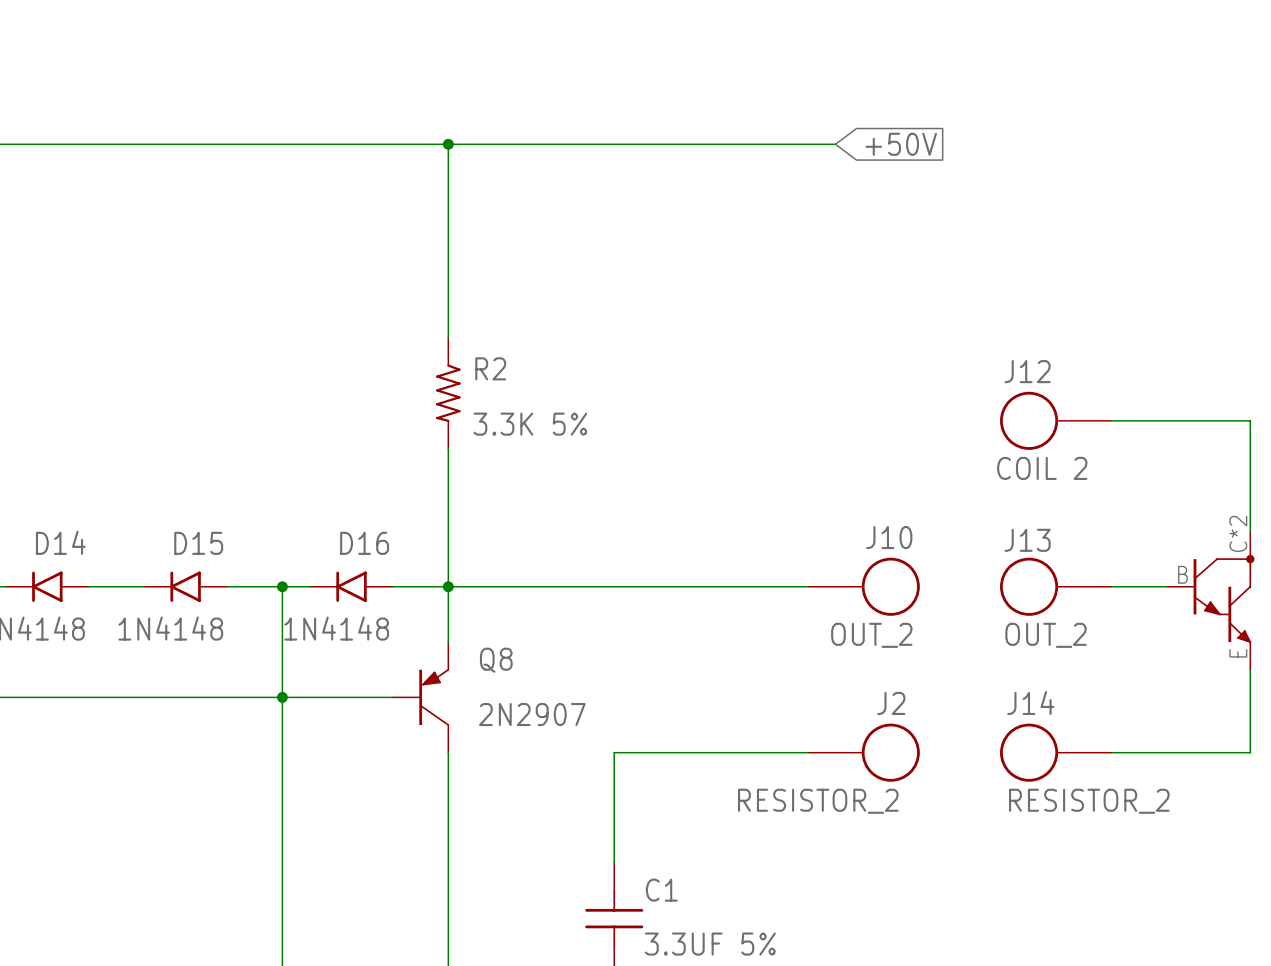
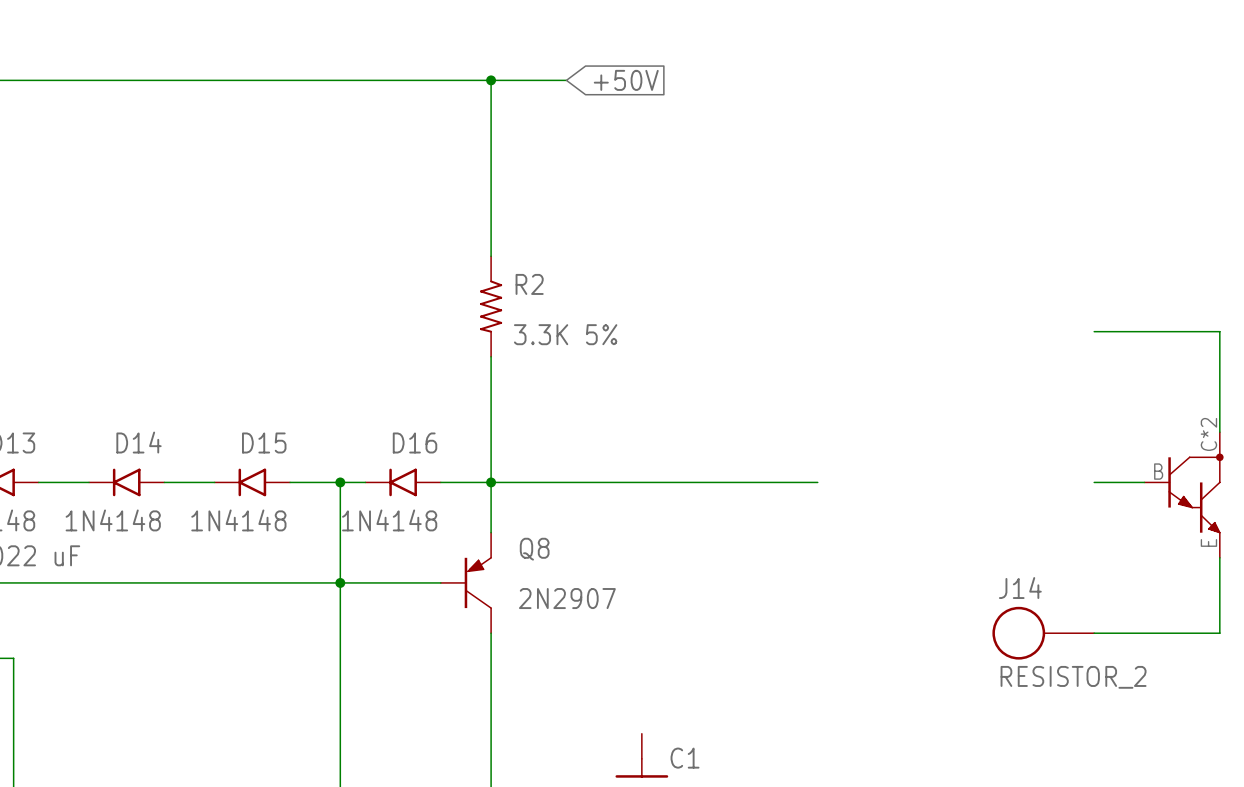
wire: (531, 144) (835, 144) -> none
global label: none -> +50V (626, 80)
global label: +50V (901, 144) -> none
J12: COIL 2 (1056, 420) -> none
J10: OUT_2 (863, 586) -> none
J13: OUT_2 (1056, 586) -> none
wire: (807, 752) (614, 752) (614, 863) -> none
J2: RESISTOR_2 (863, 752) -> none

